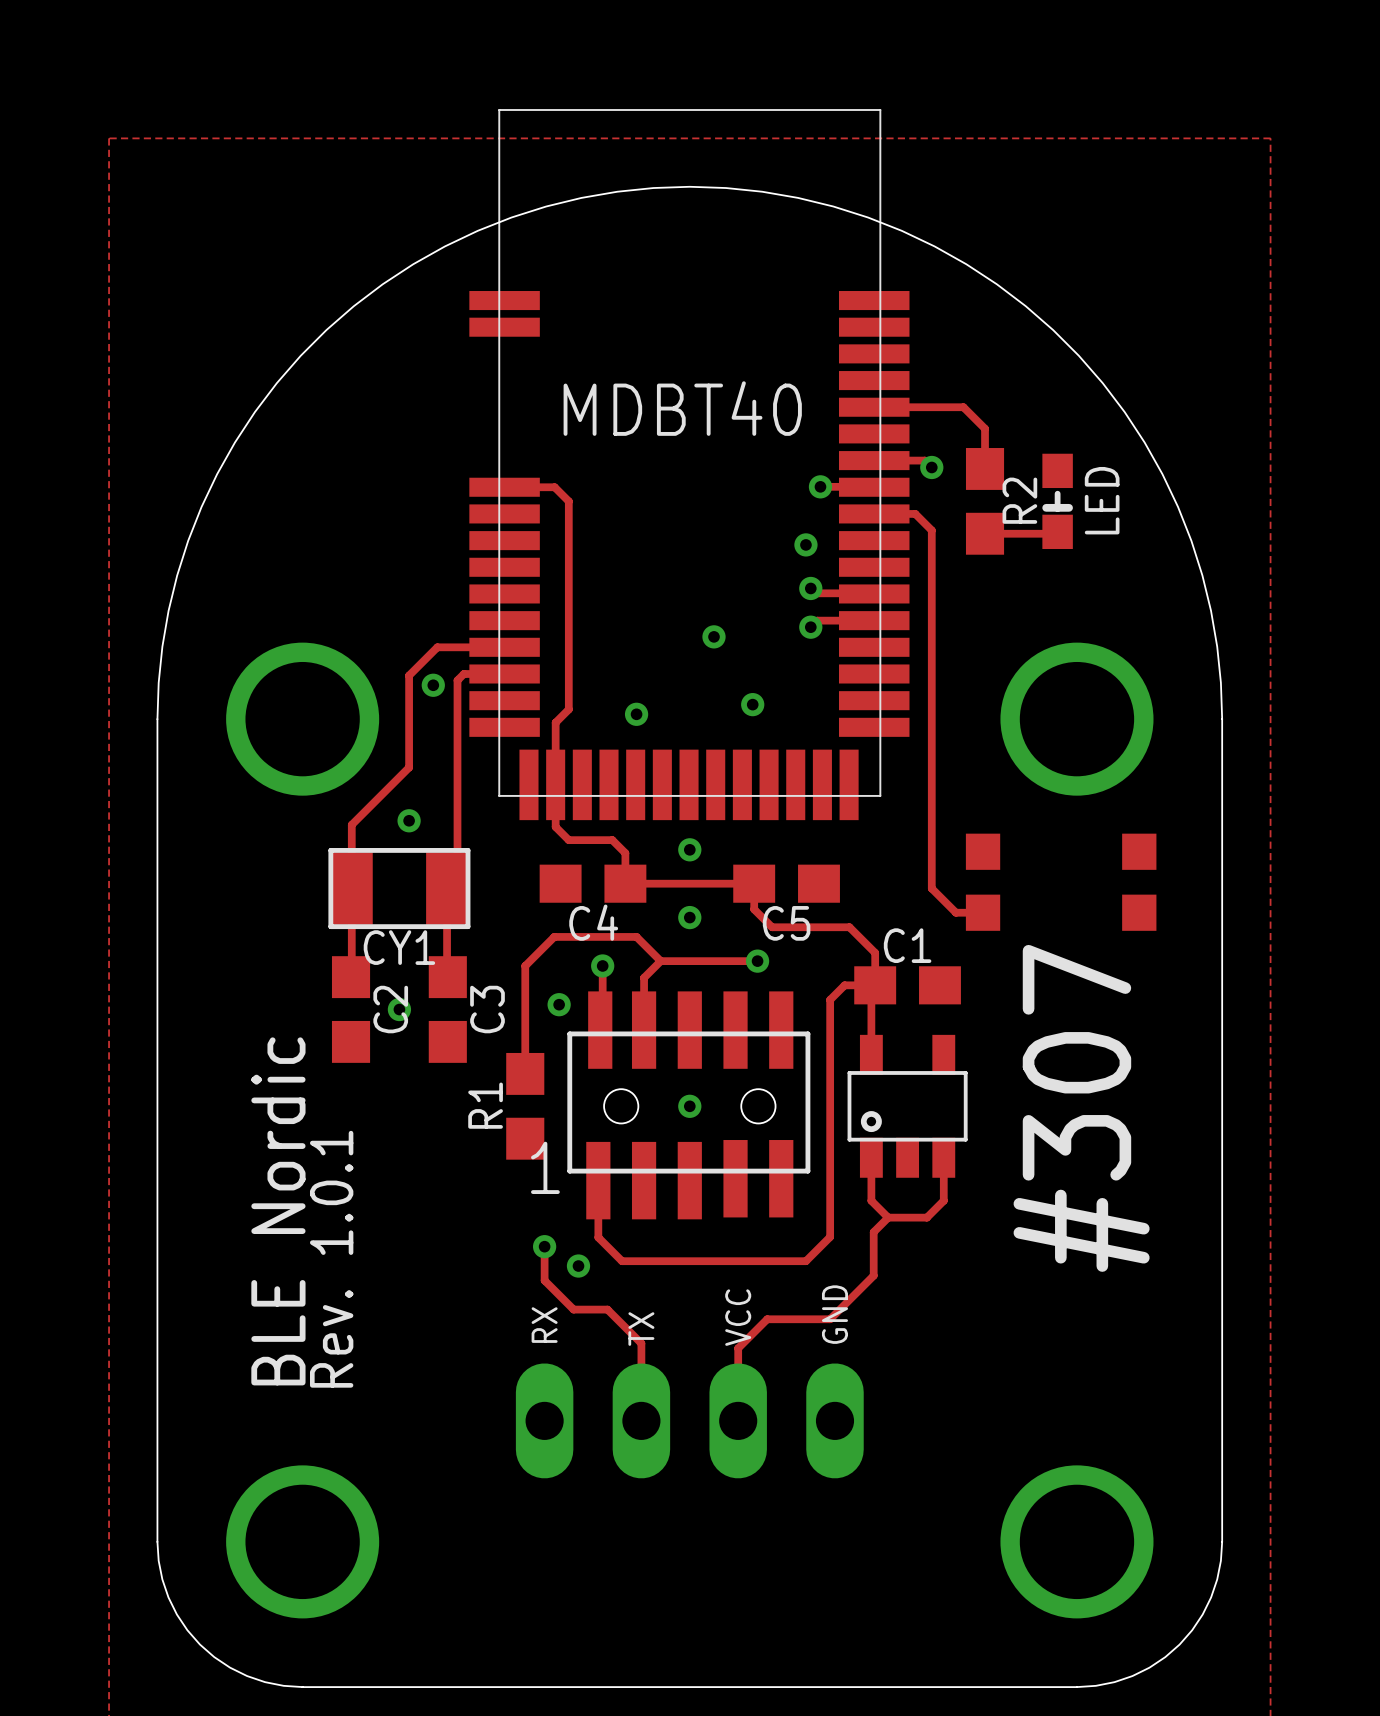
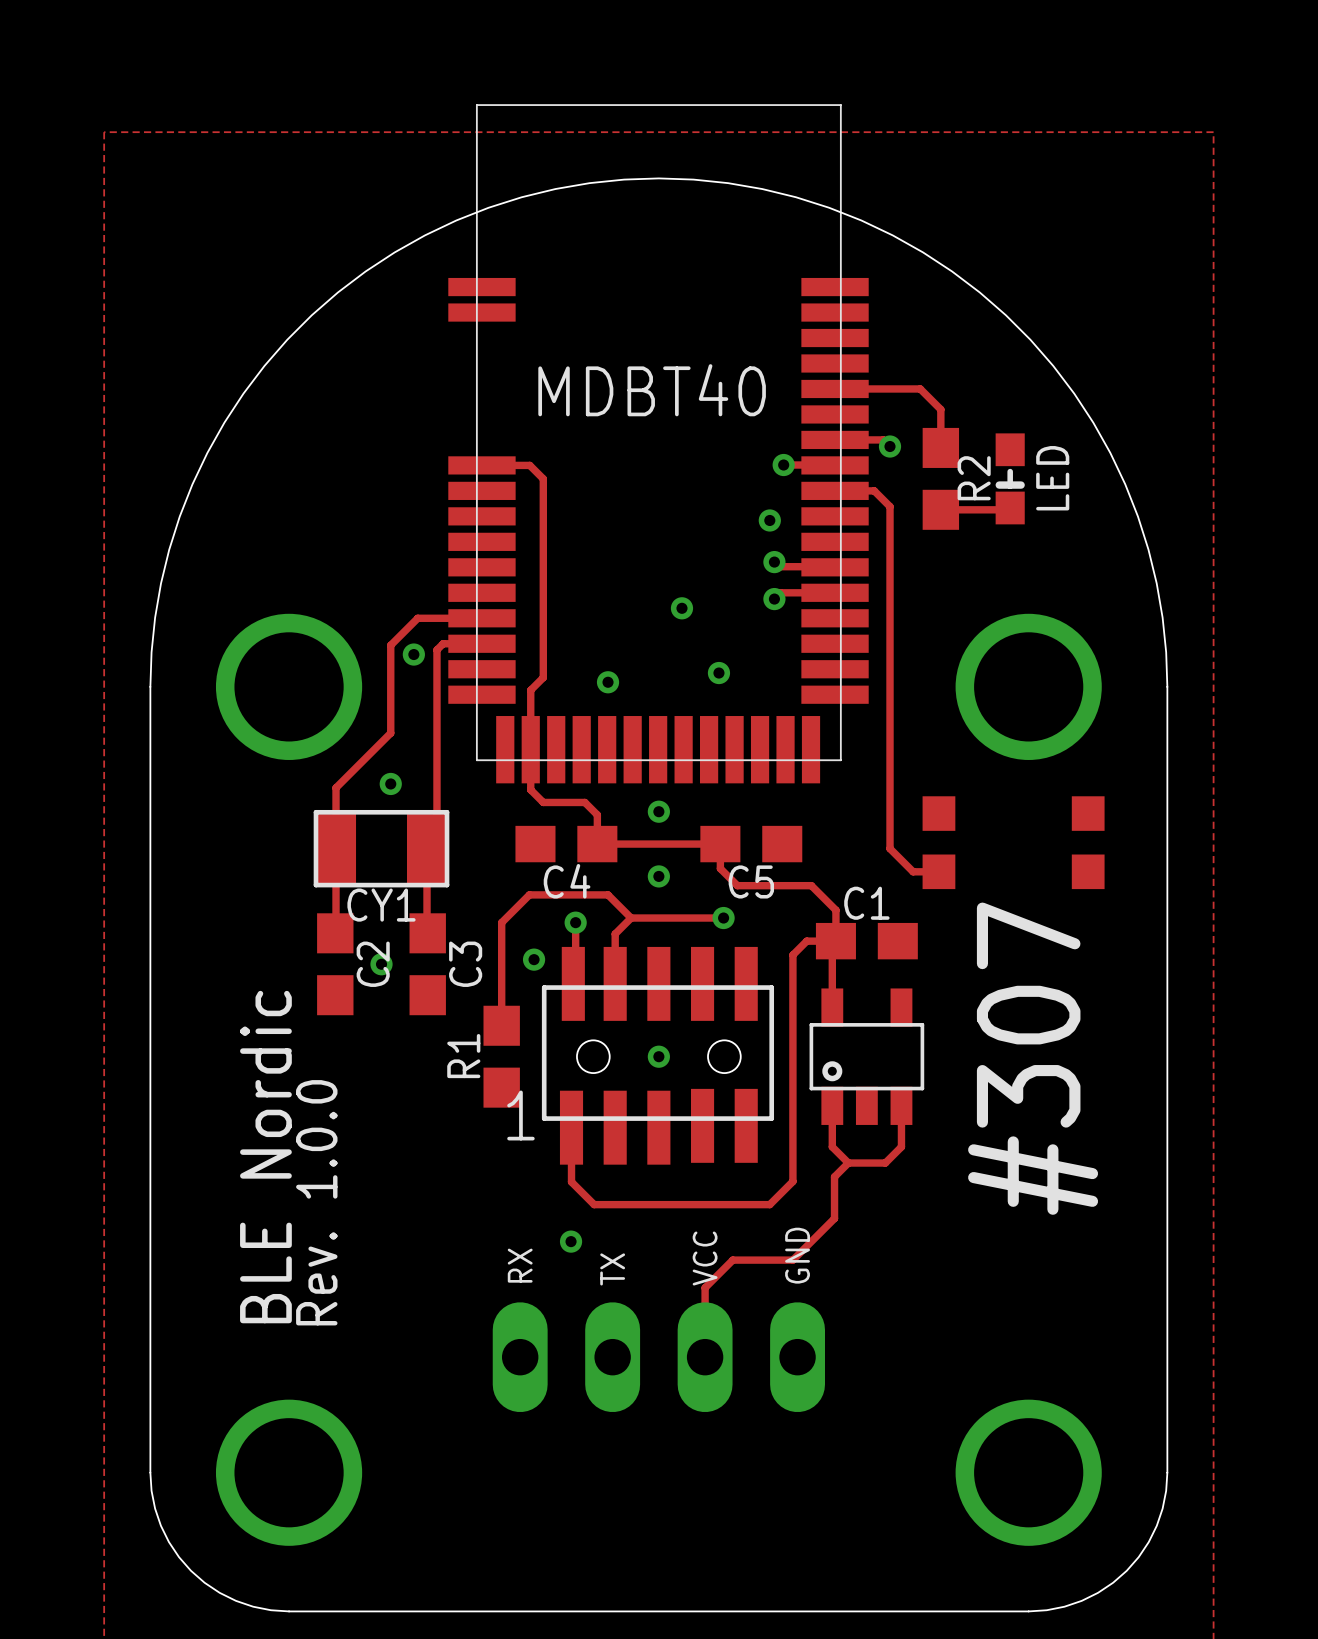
track: (544, 1246) (544, 1280) (573, 1309) (607, 1309) (641, 1343) (641, 1420) -> none
via: (544, 1246) -> none
text: Rev. 1.0.1 (331, 1259) -> Rev. 1.0.0 (316, 1202)
via: (578, 1266) -> none
via: none -> (571, 1241)

